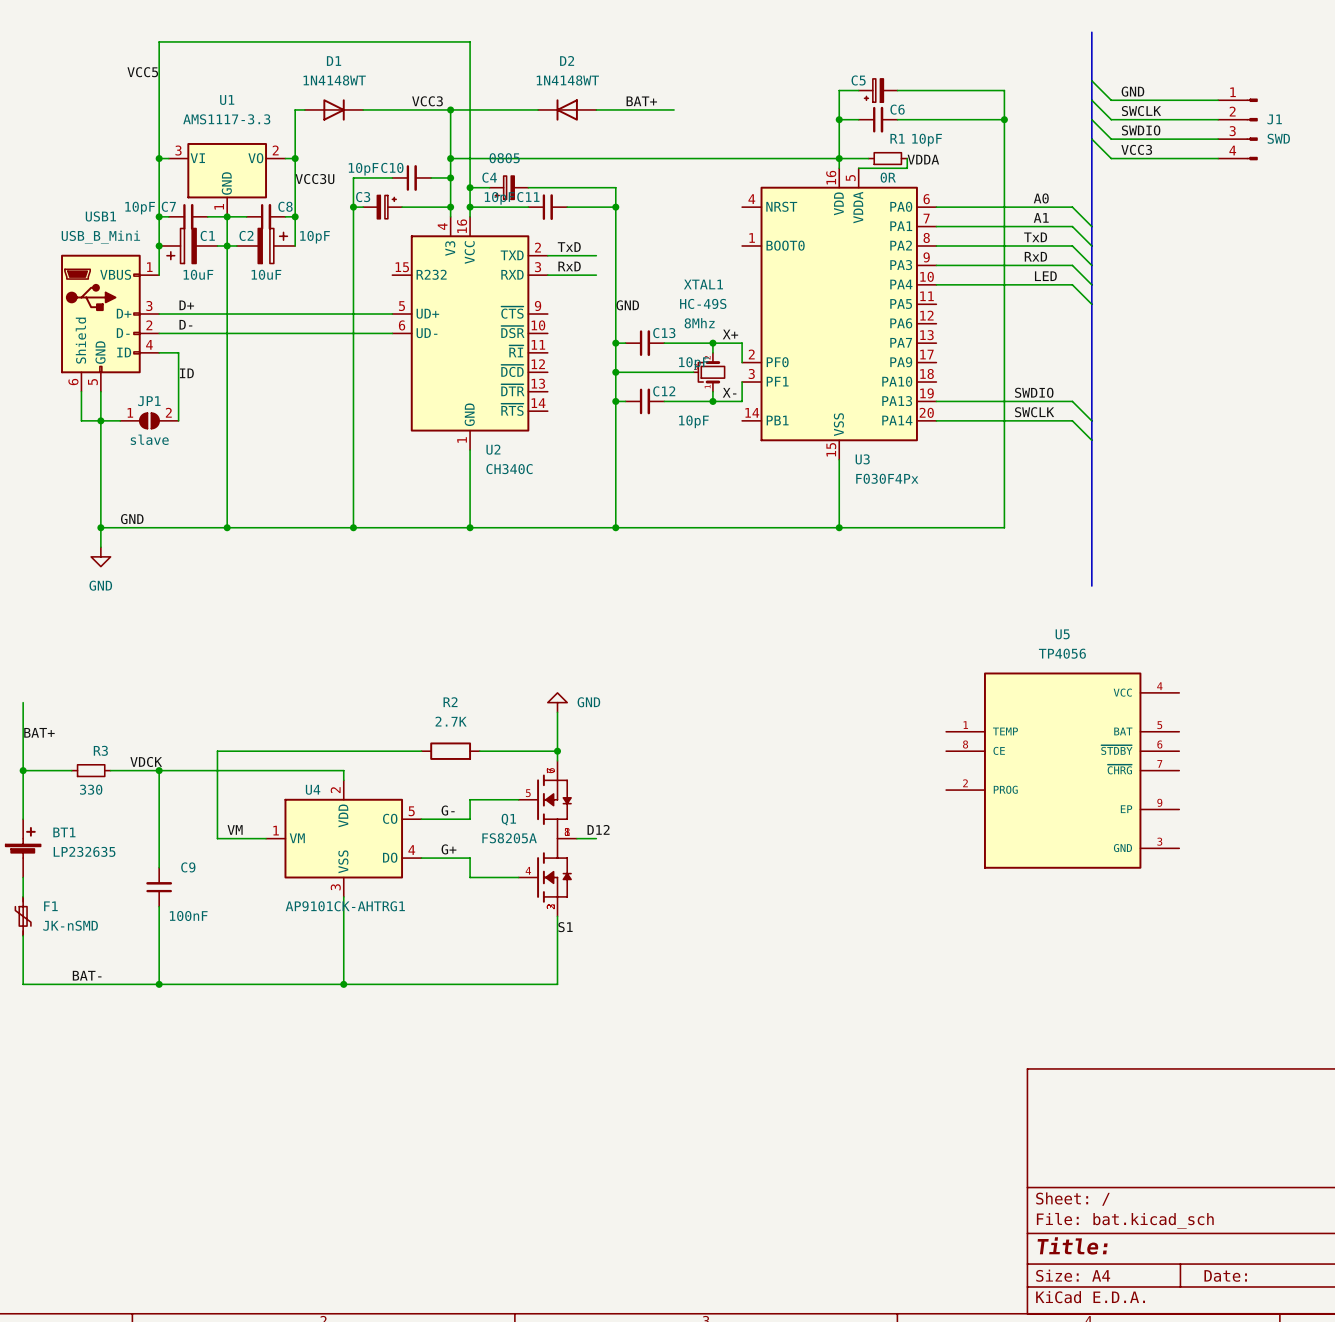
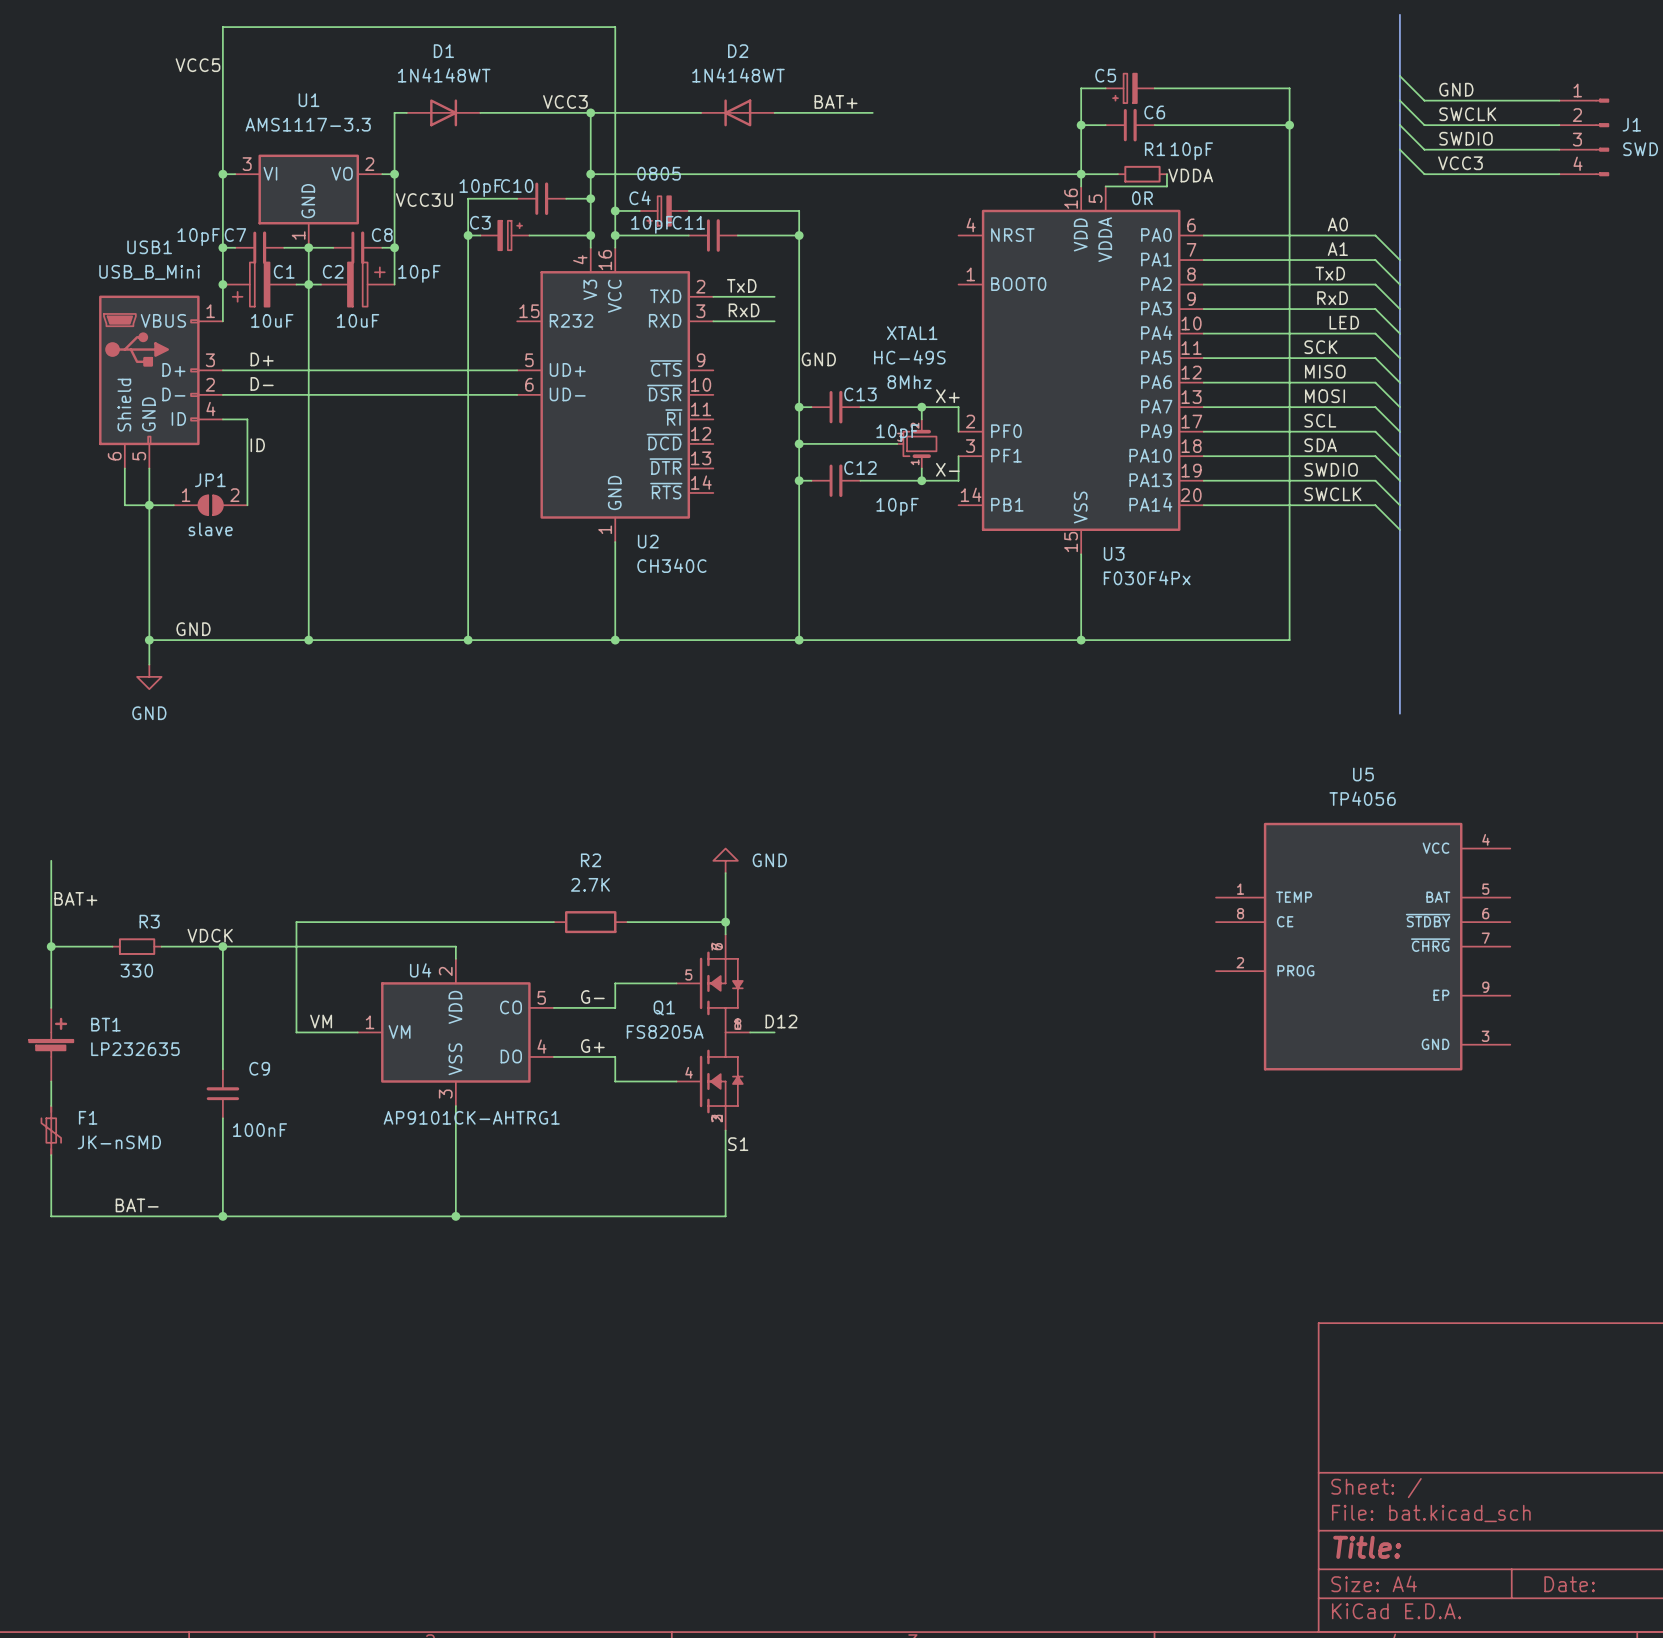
label: none -> SCK (1320, 347)
wire: none -> (1203, 358) (1375, 358) (1399, 382)
label: none -> MISO (1325, 371)
wire: none -> (1203, 382) (1375, 382) (1399, 407)
label: none -> MOSI (1325, 396)
wire: none -> (1203, 407) (1375, 407) (1399, 431)
label: none -> SCL (1320, 420)
wire: none -> (1203, 431) (1375, 431) (1399, 456)
label: none -> SDA (1320, 445)
wire: none -> (1203, 456) (1375, 456) (1399, 480)

